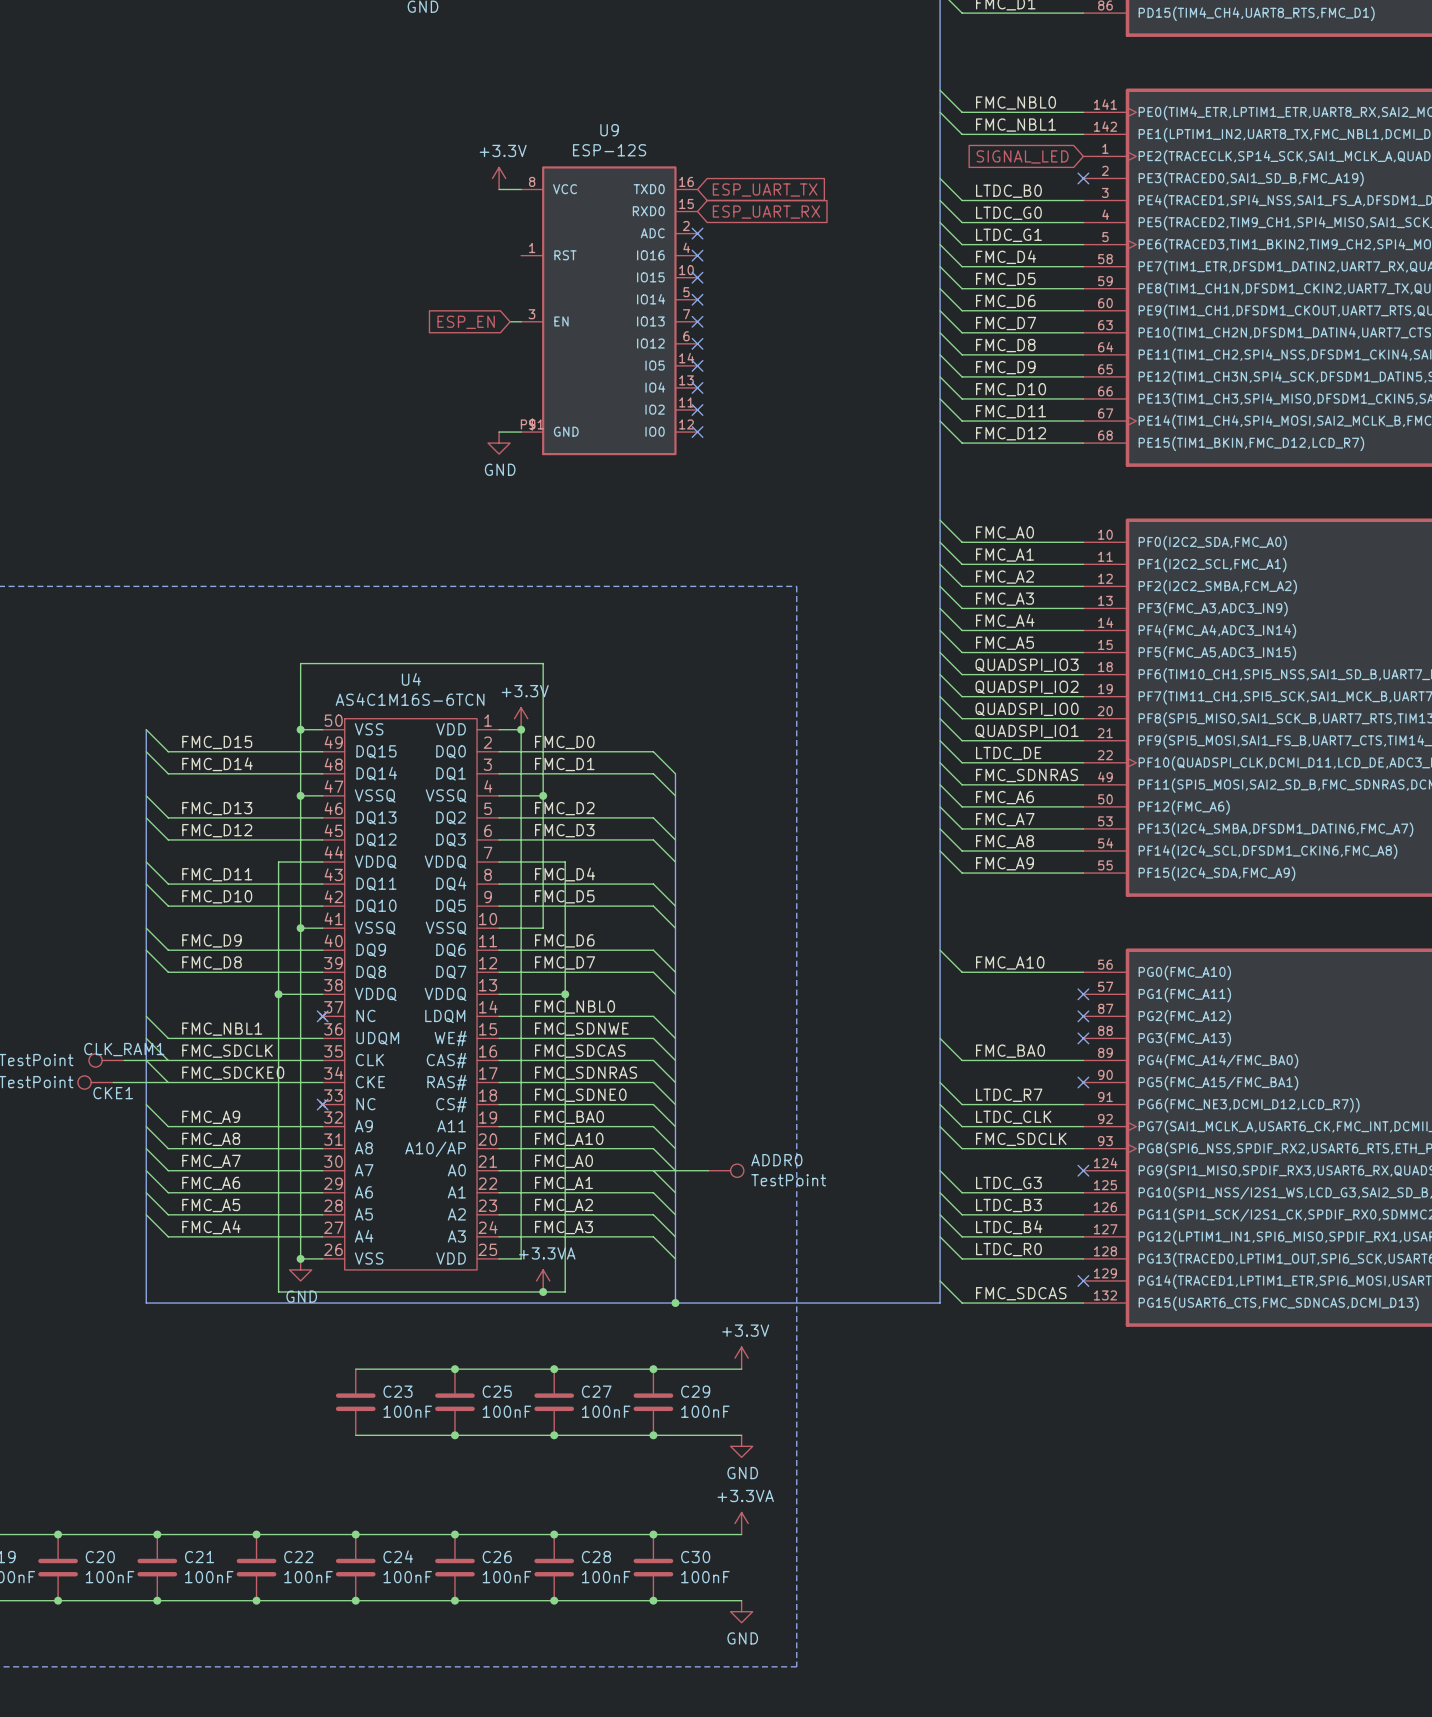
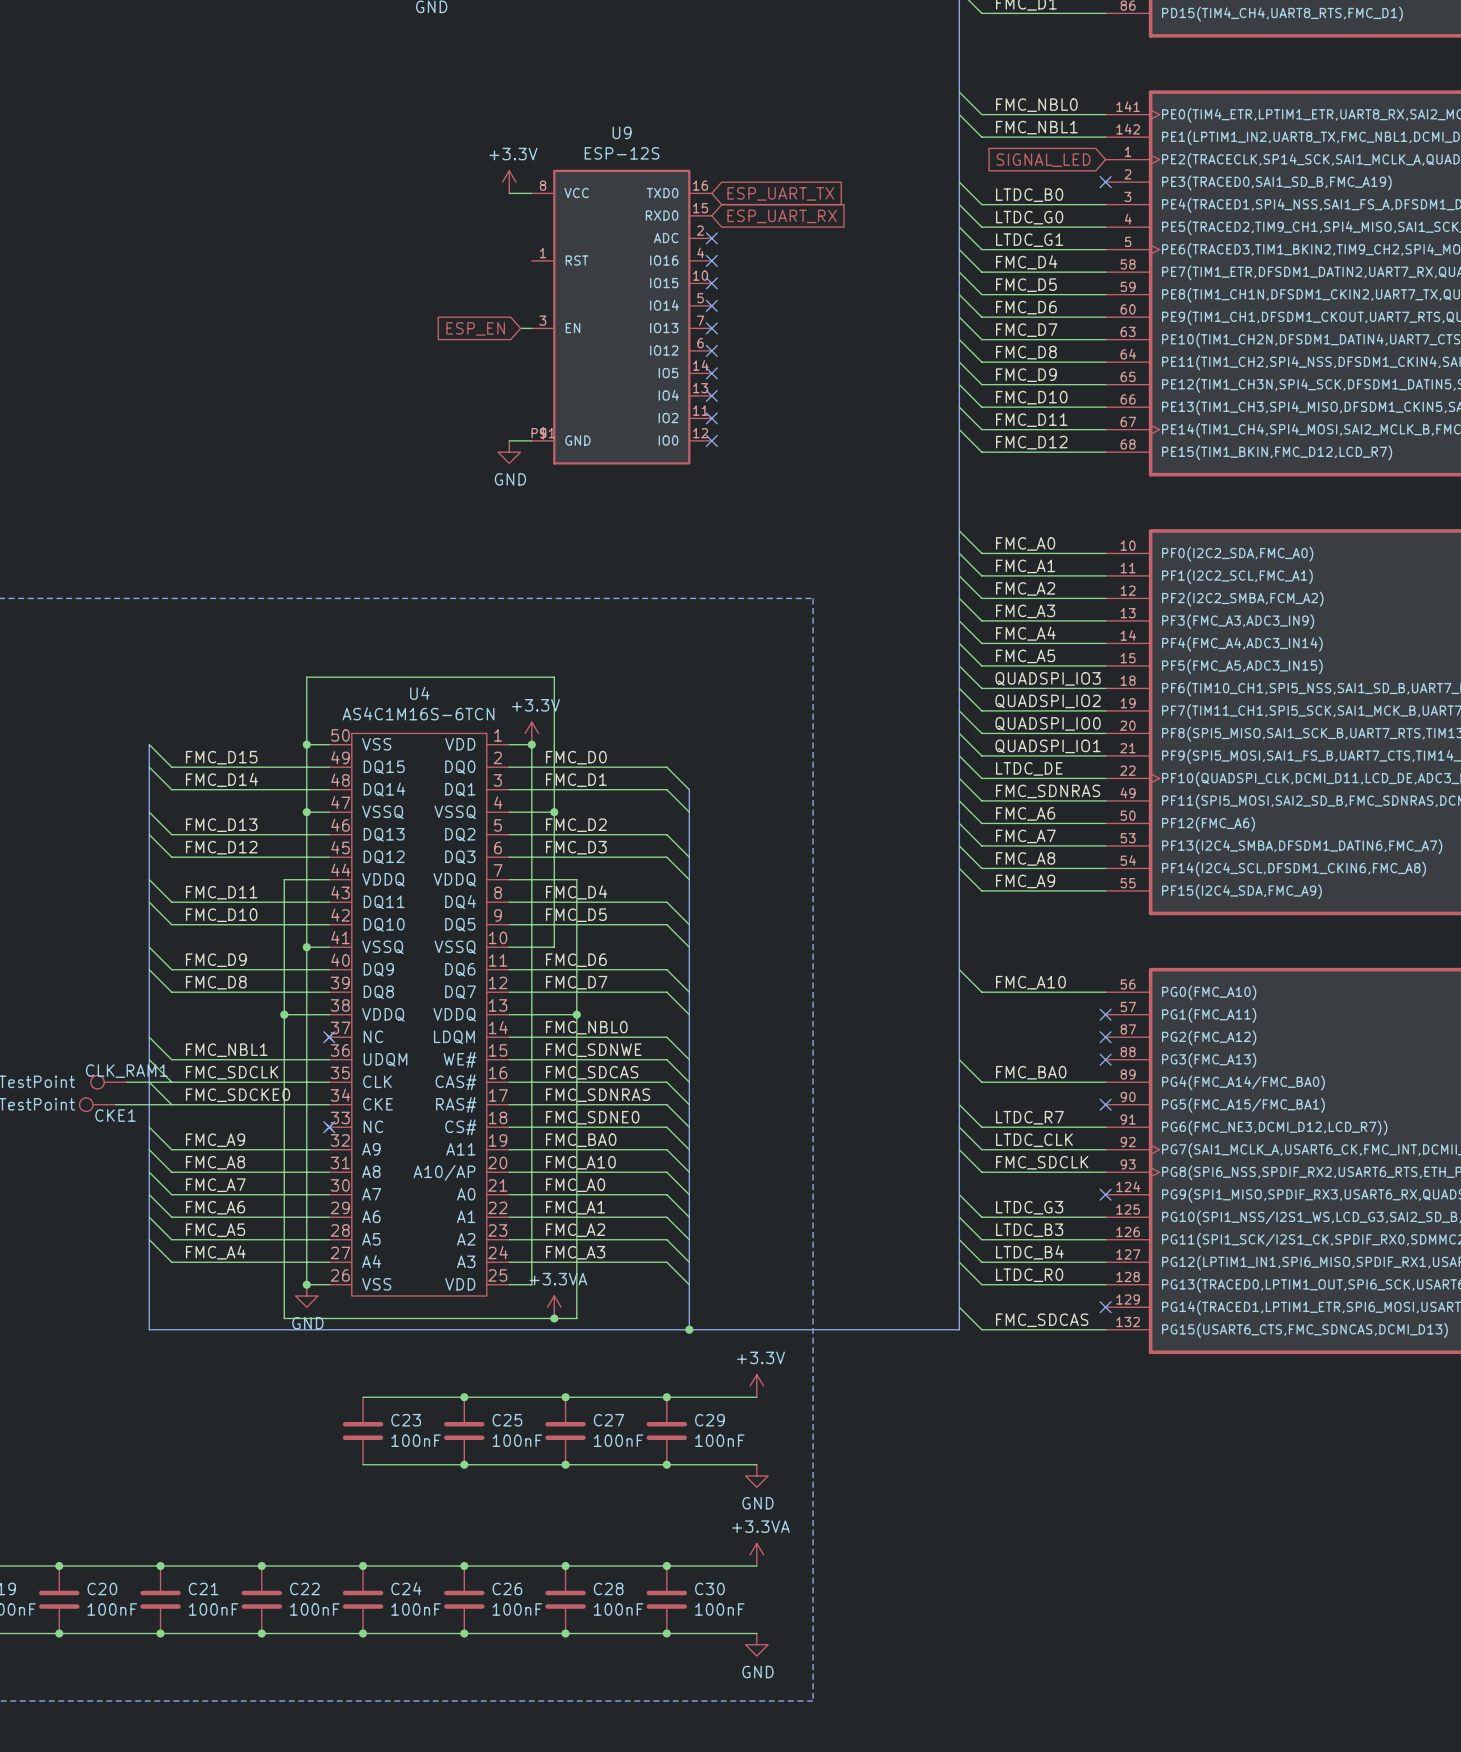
wire: (653, 1170) (708, 1170) -> none
ADDR0: TestPoint (726, 1170) -> none

